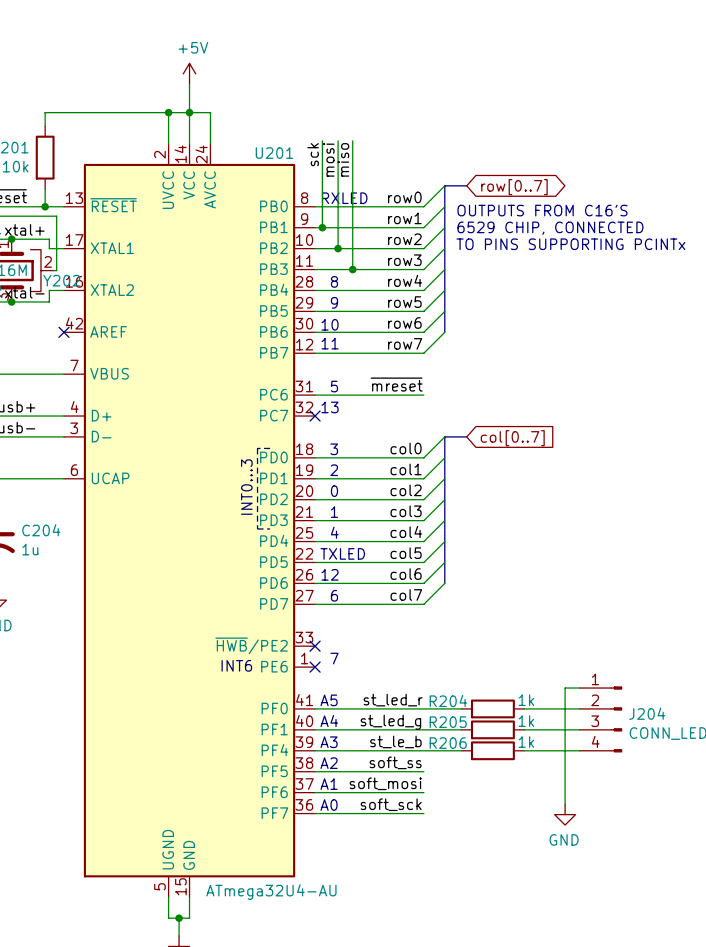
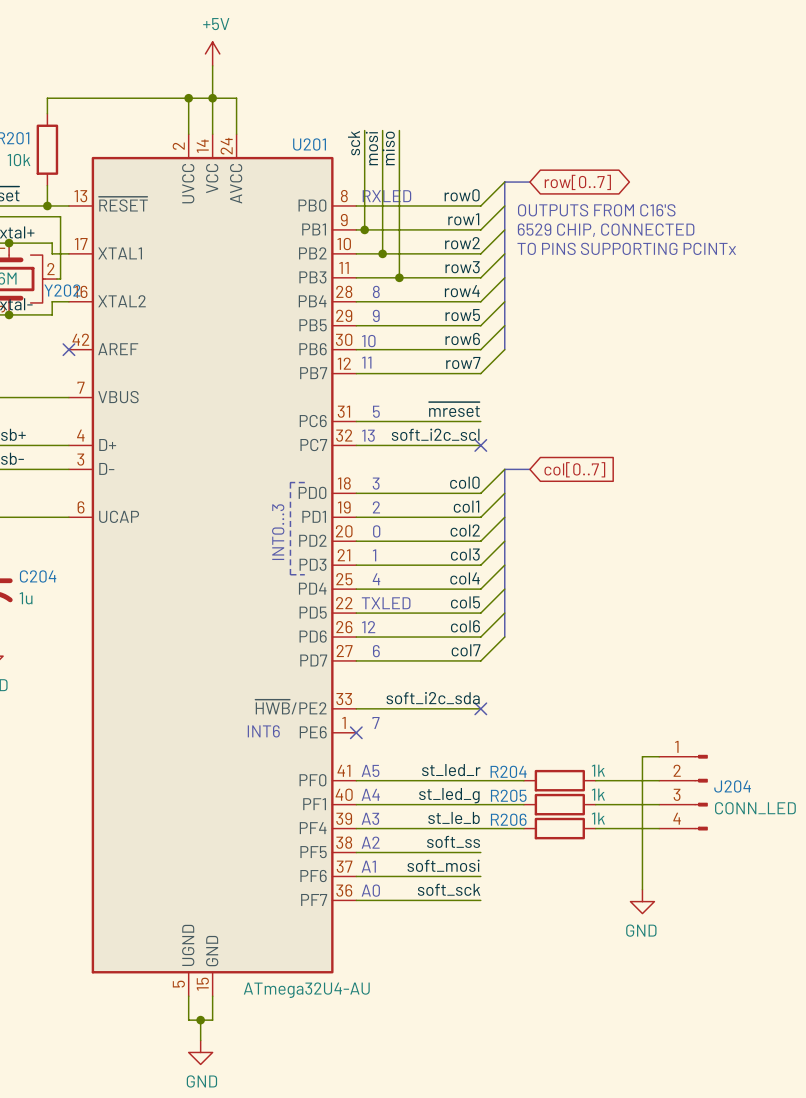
label: none -> soft_i2c_scl (435, 434)
wire: none -> (356, 445) (480, 445)
no-connect mark: (315, 416) -> none
no-connect mark: none -> (480, 445)
label: none -> soft_i2c_sda (433, 698)
wire: none -> (356, 708) (480, 708)
no-connect mark: (315, 646) -> none
no-connect mark: none -> (480, 708)

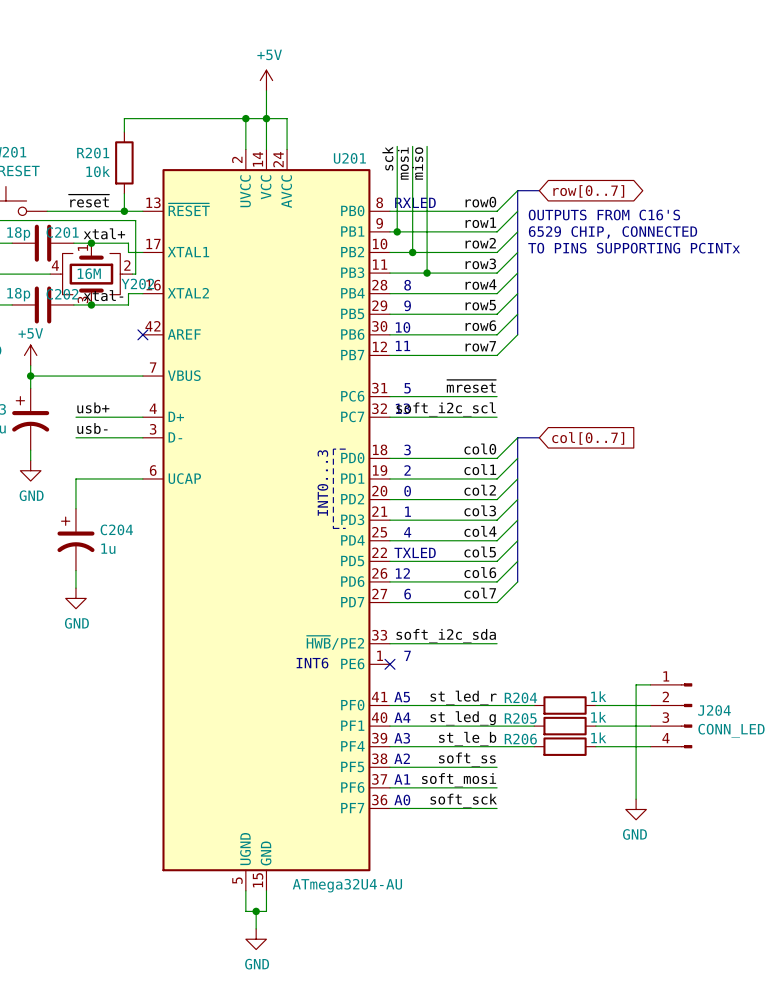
no-connect mark: (480, 445) -> none
no-connect mark: (480, 708) -> none

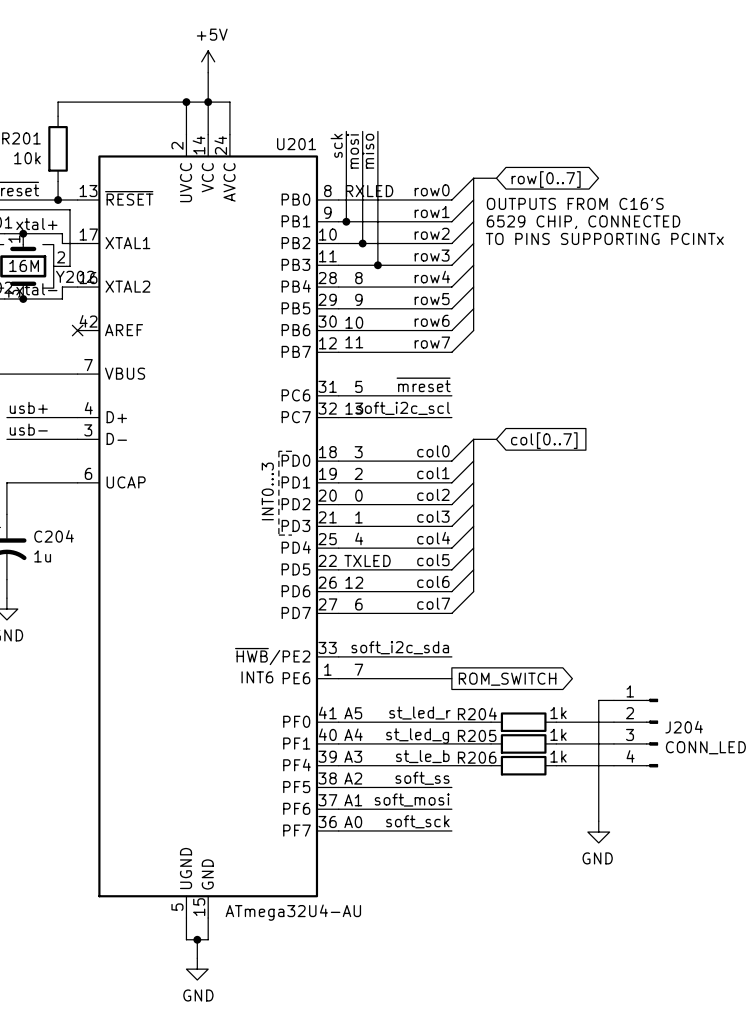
wire: none -> (338, 678) (451, 678)
no-connect mark: (390, 664) -> none
global label: none -> ROM_SWITCH (507, 679)

